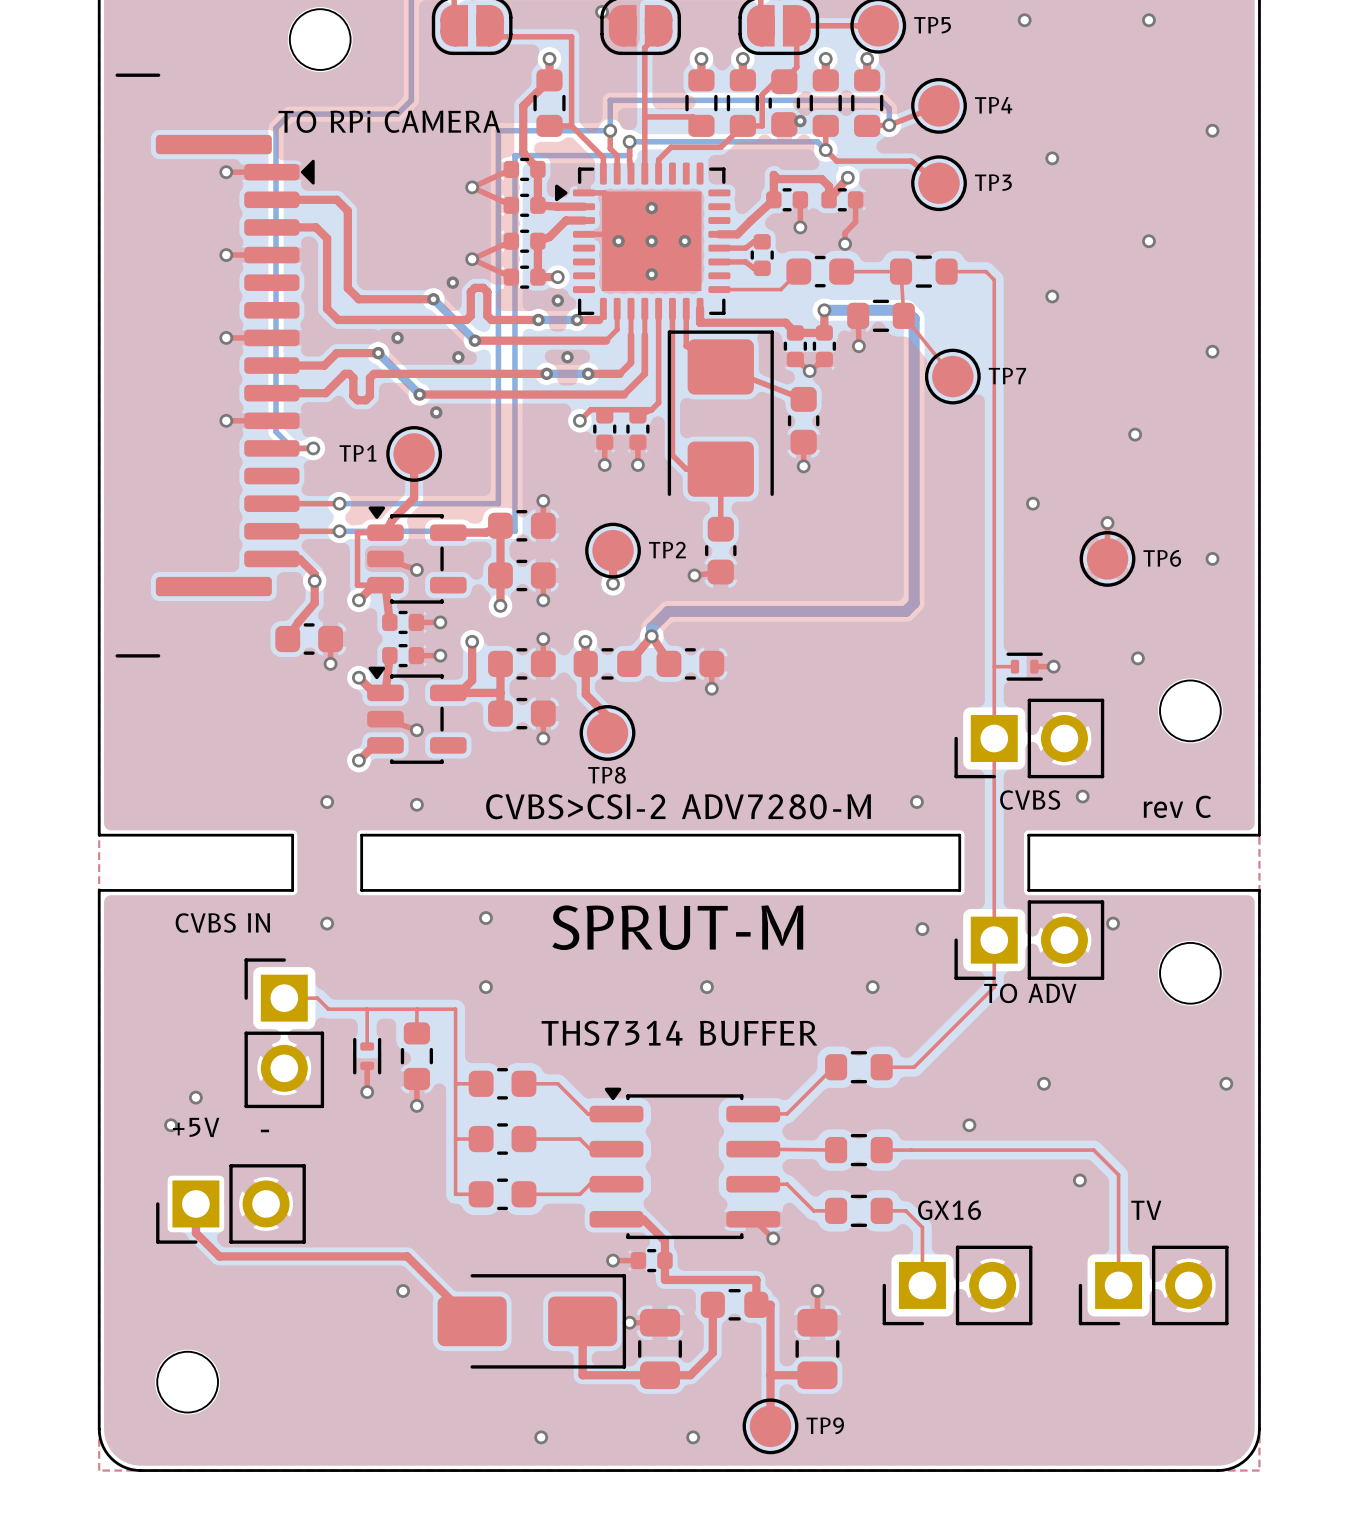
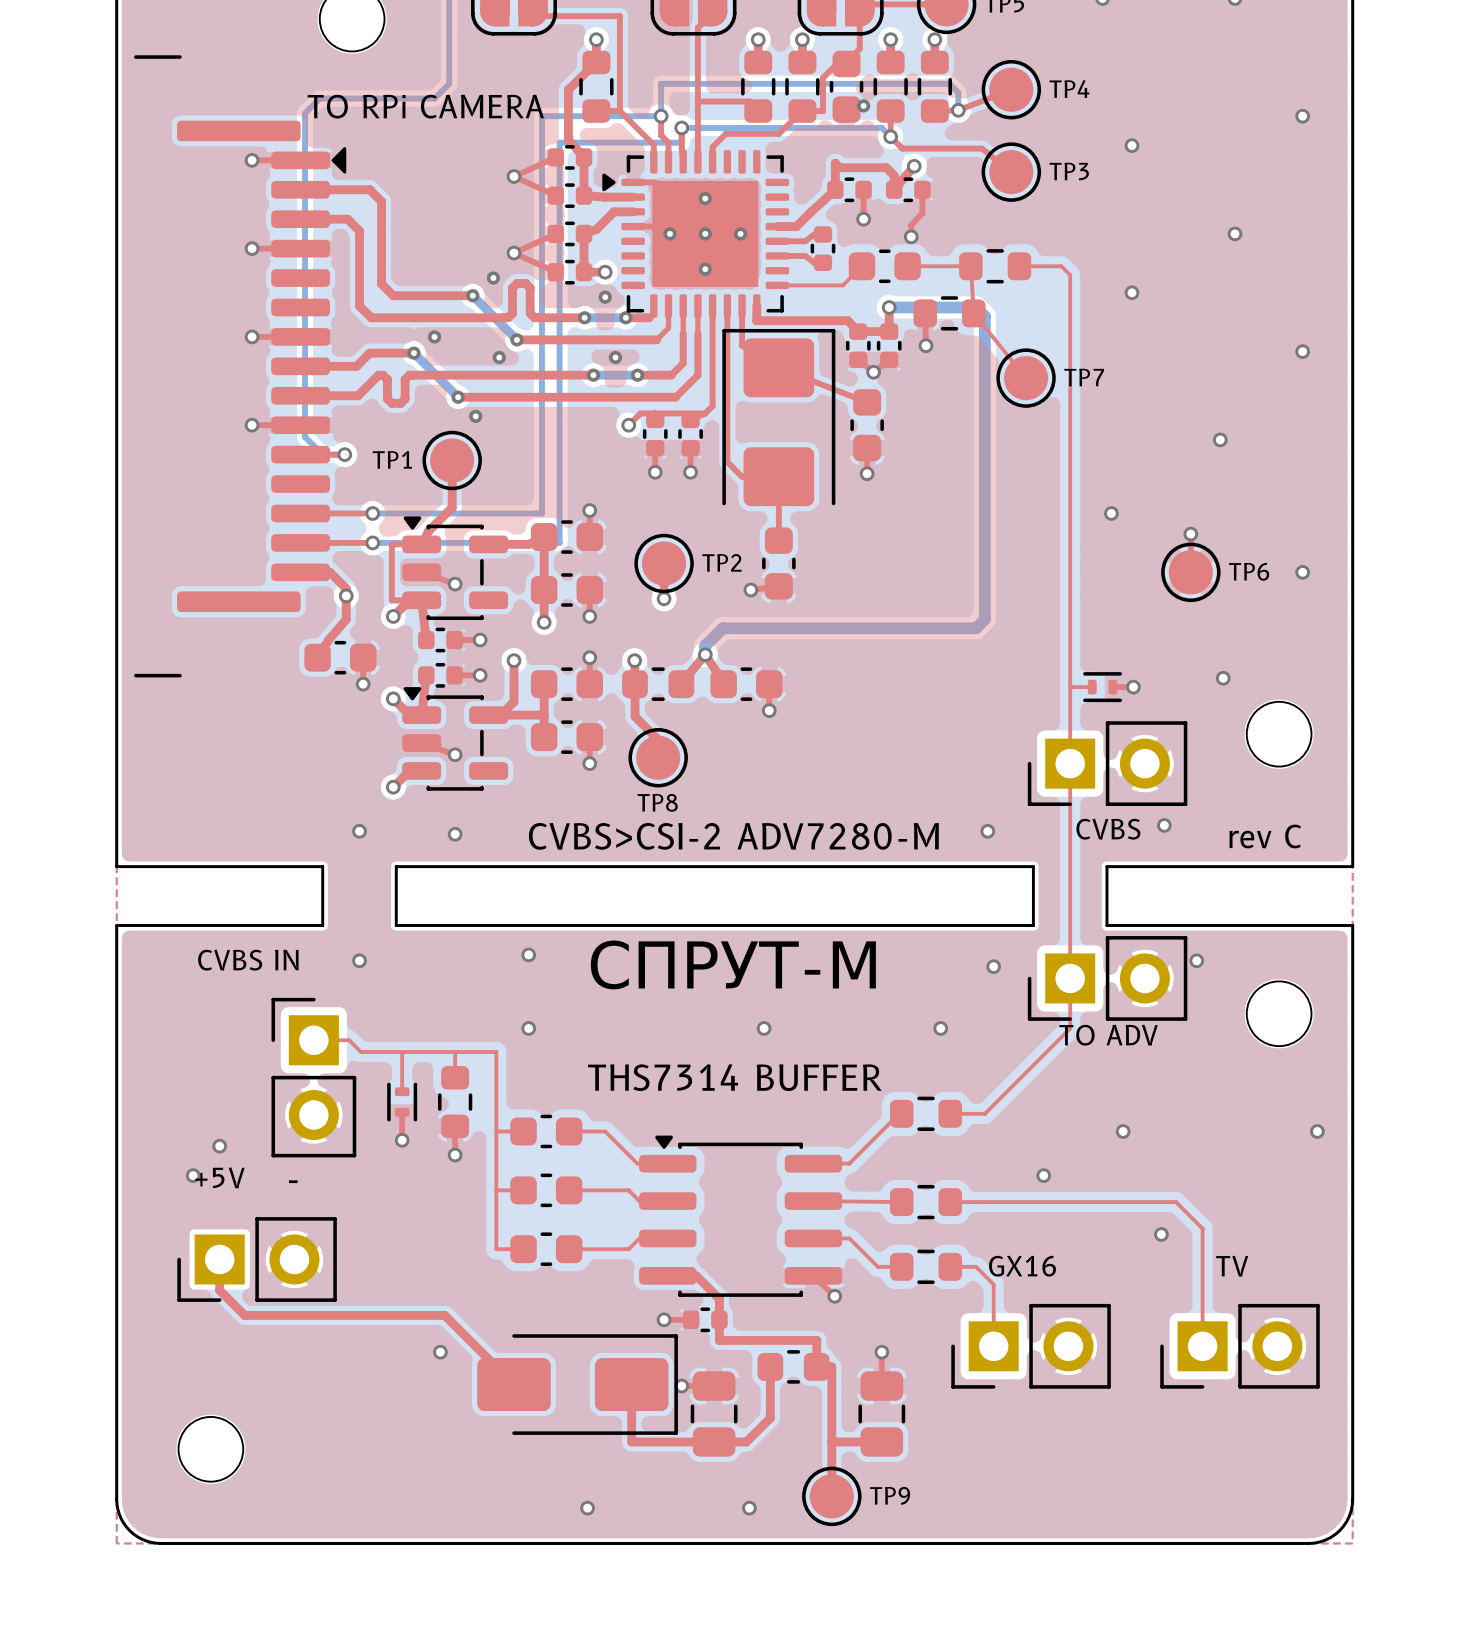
text: SPRUT-M (677, 927) -> СПРУТ-М (733, 964)

